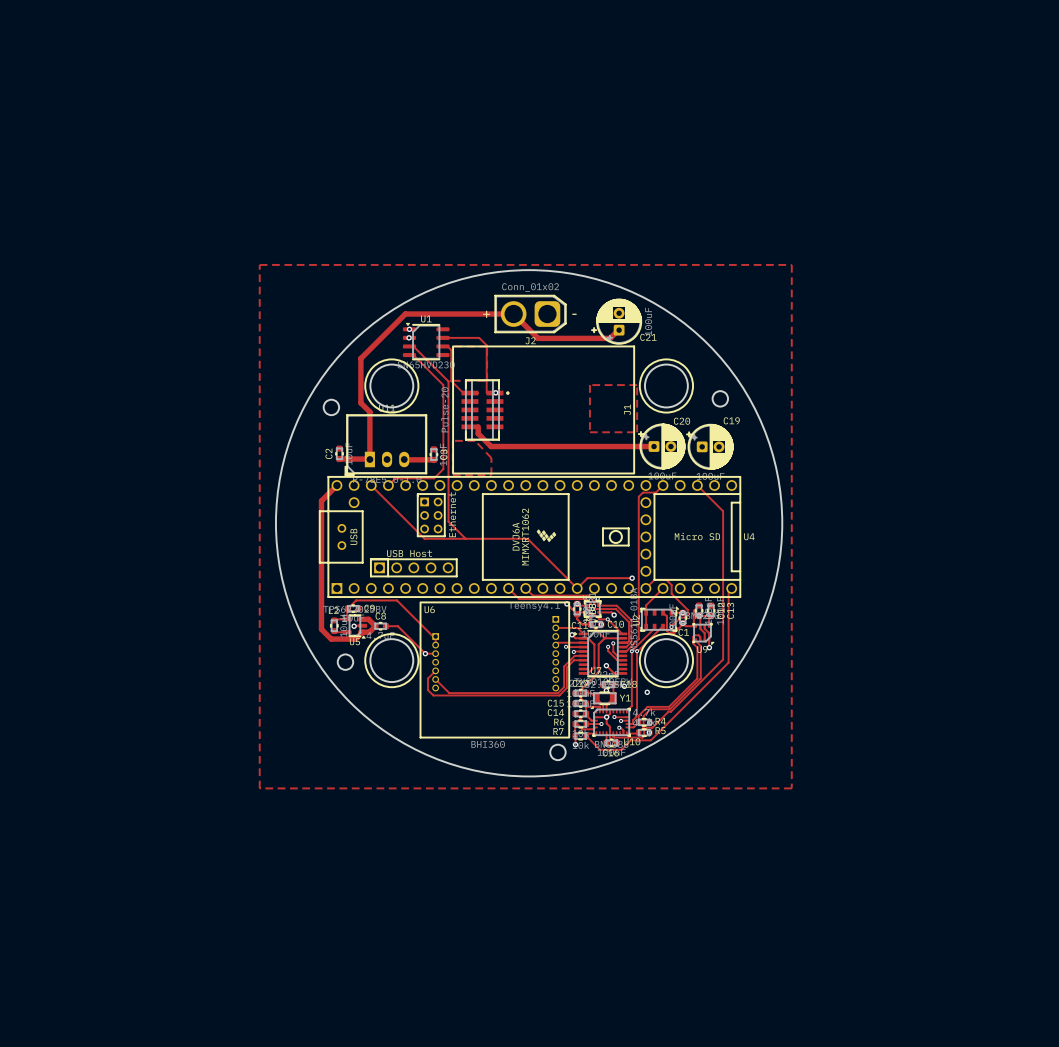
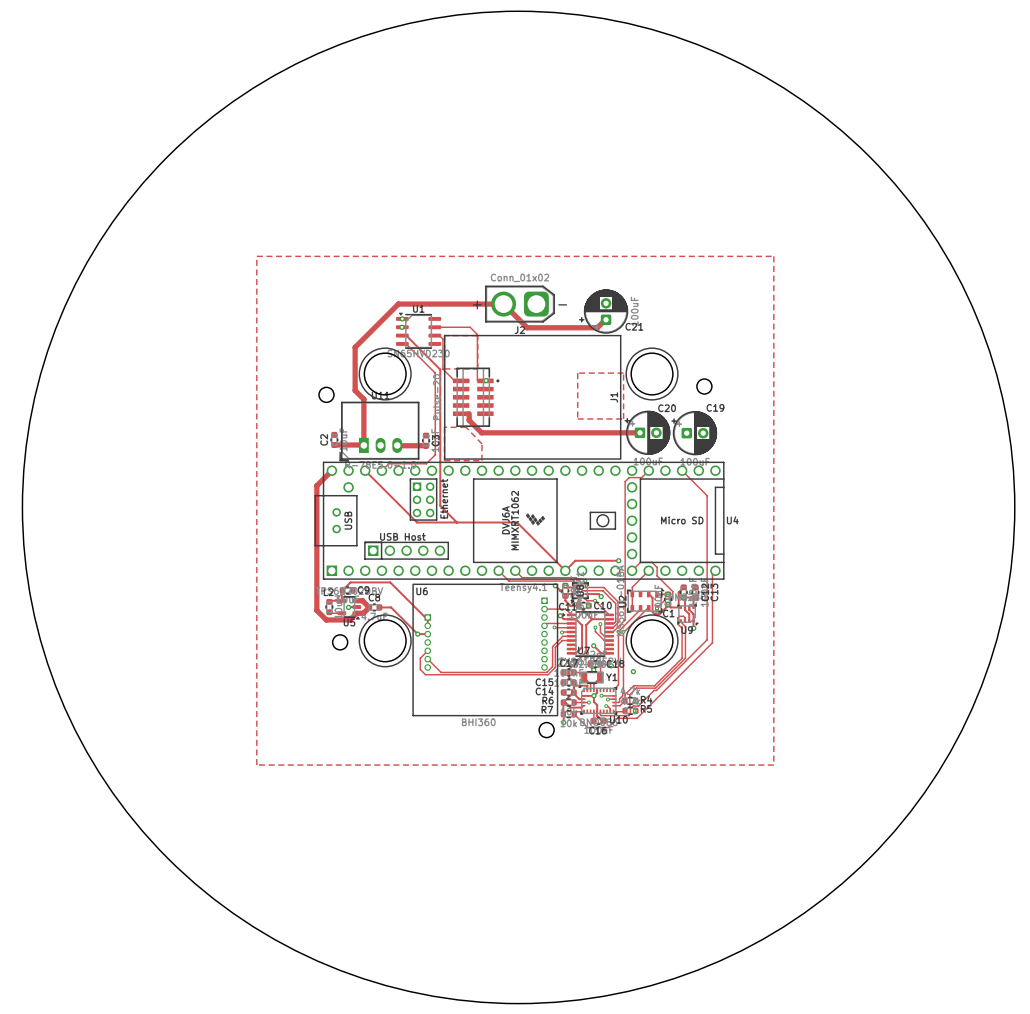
round board edge size: [275, 269, 783, 778] -> [21, 10, 1016, 1005]

